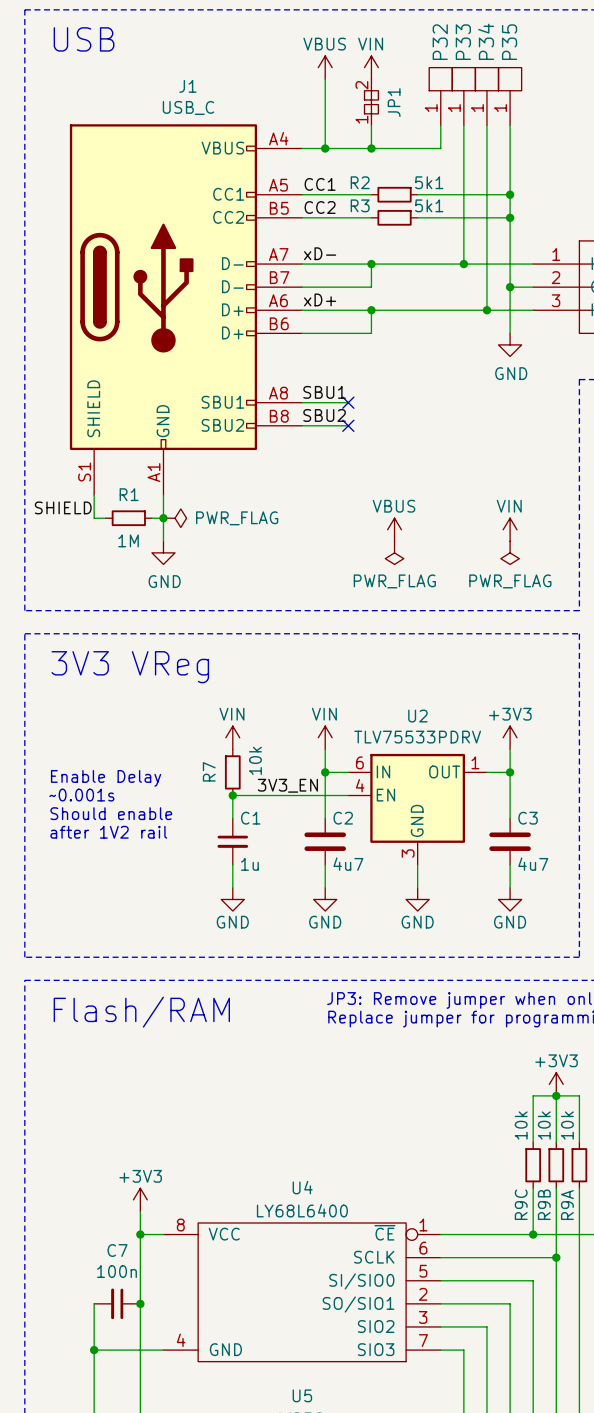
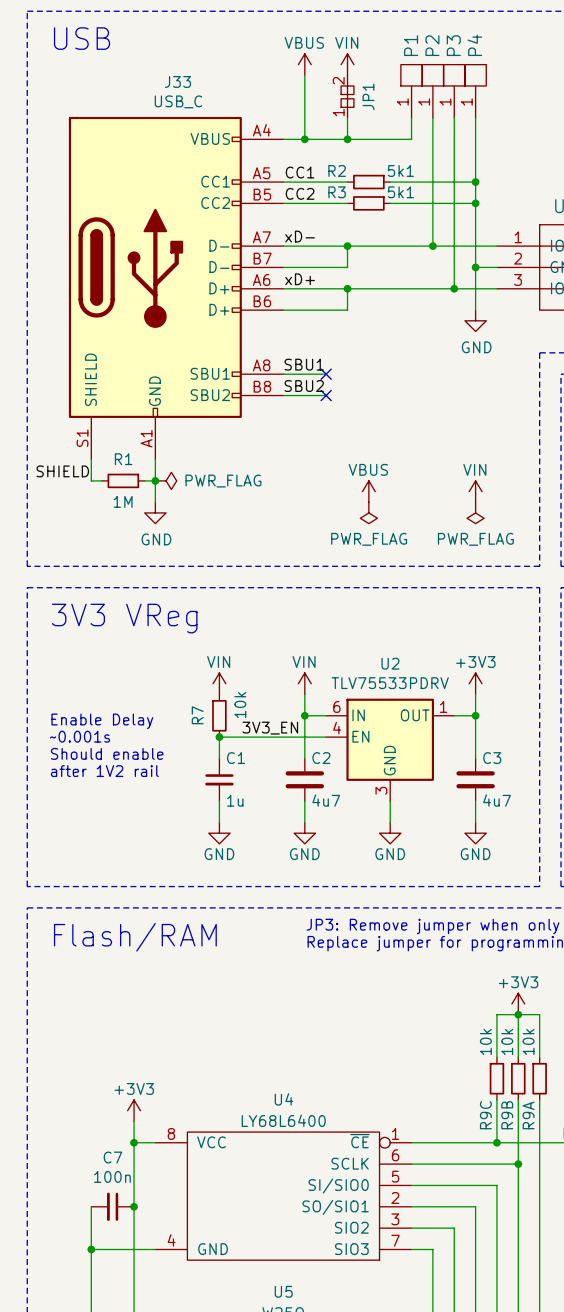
P34 name: P34 (486, 41) -> P3 (453, 45)
P32 name: P32 (440, 42) -> P1 (411, 45)
P33 name: P33 (463, 42) -> P2 (432, 45)
P35 name: P35 (509, 42) -> P4 (474, 45)
J1 name: J1 (187, 86) -> J33 (177, 81)

